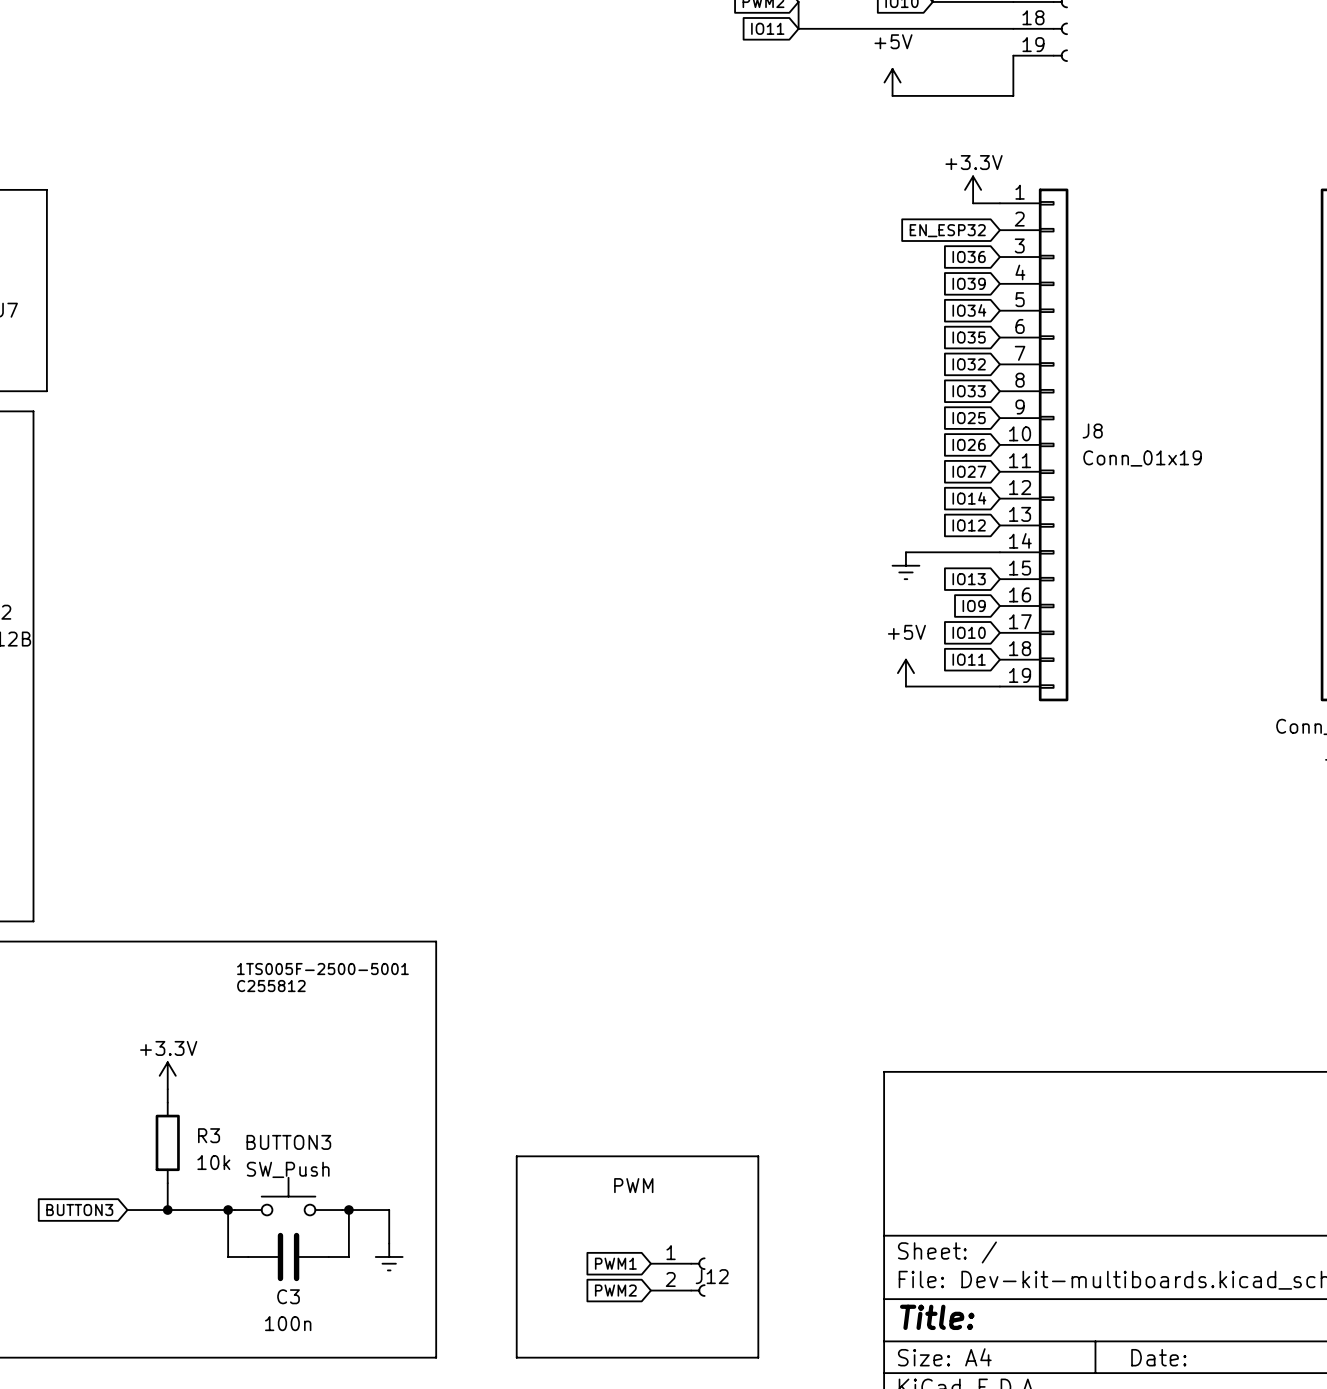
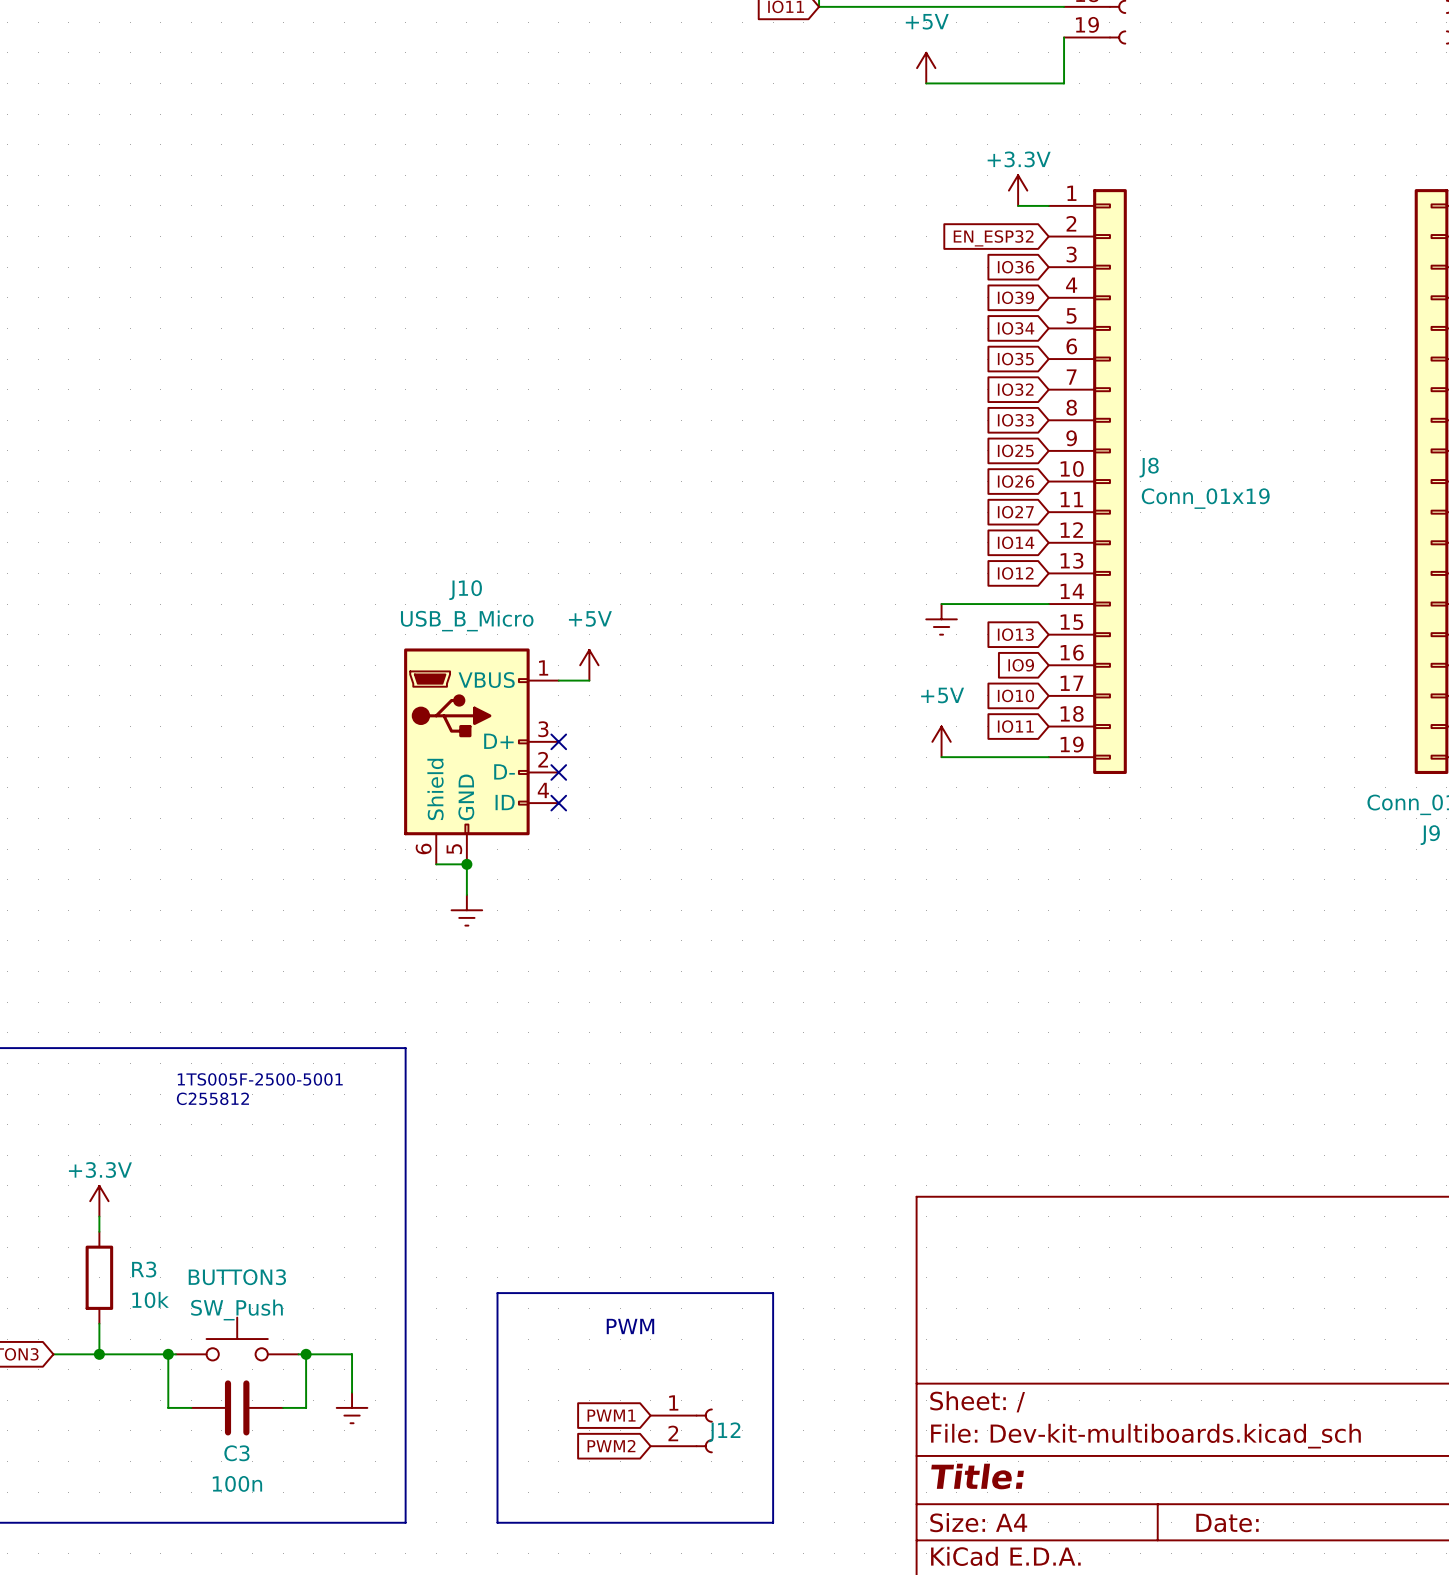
power symbol: none -> +5V (589, 665)
wire: none -> (558, 680) (589, 680)
no-connect mark: none -> (558, 741)
J10: none -> USB_B_Micro (481, 756)
no-connect mark: none -> (558, 772)
no-connect mark: none -> (558, 803)
wire: none -> (436, 864) (466, 864) (466, 894)
junction: none -> (466, 864)
power symbol: none -> (466, 910)

